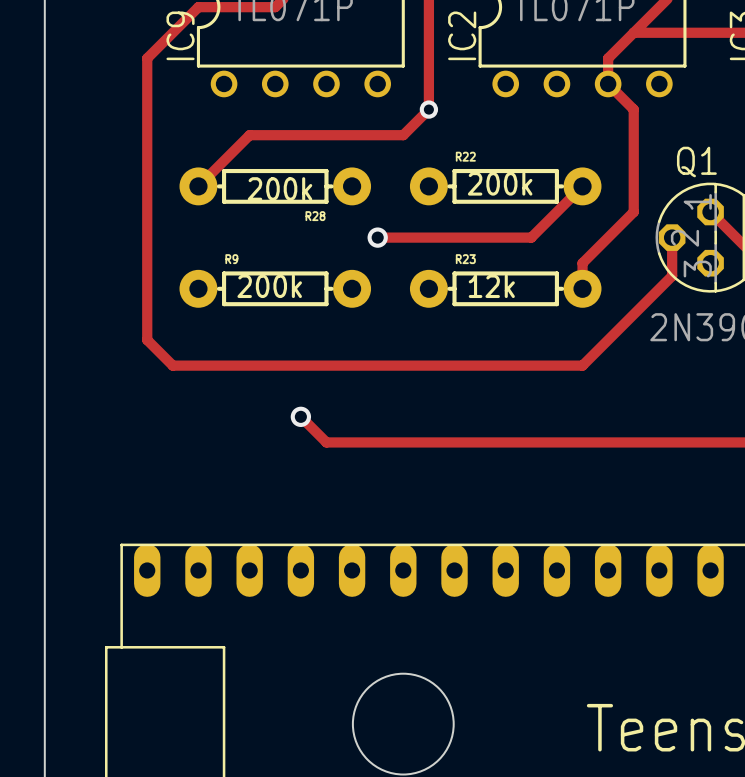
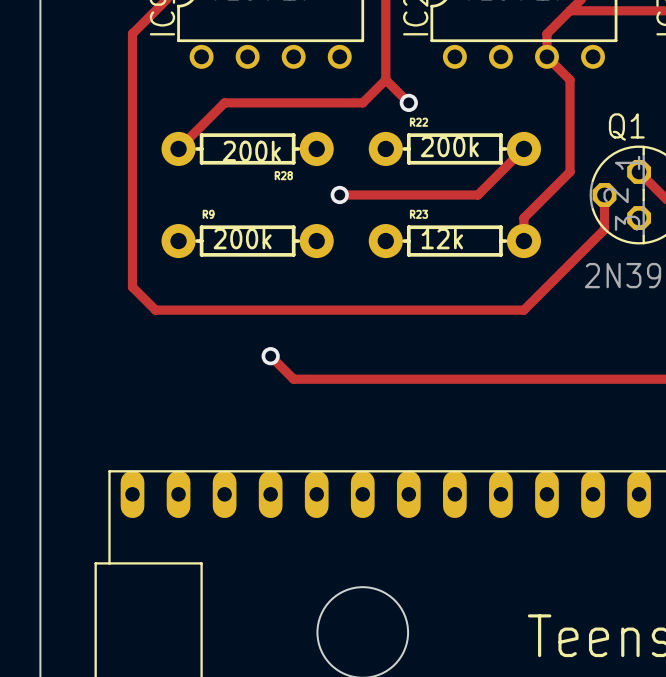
track: none -> (385, 79) (408, 102)
via: (428, 109) -> none
via: none -> (408, 102)

